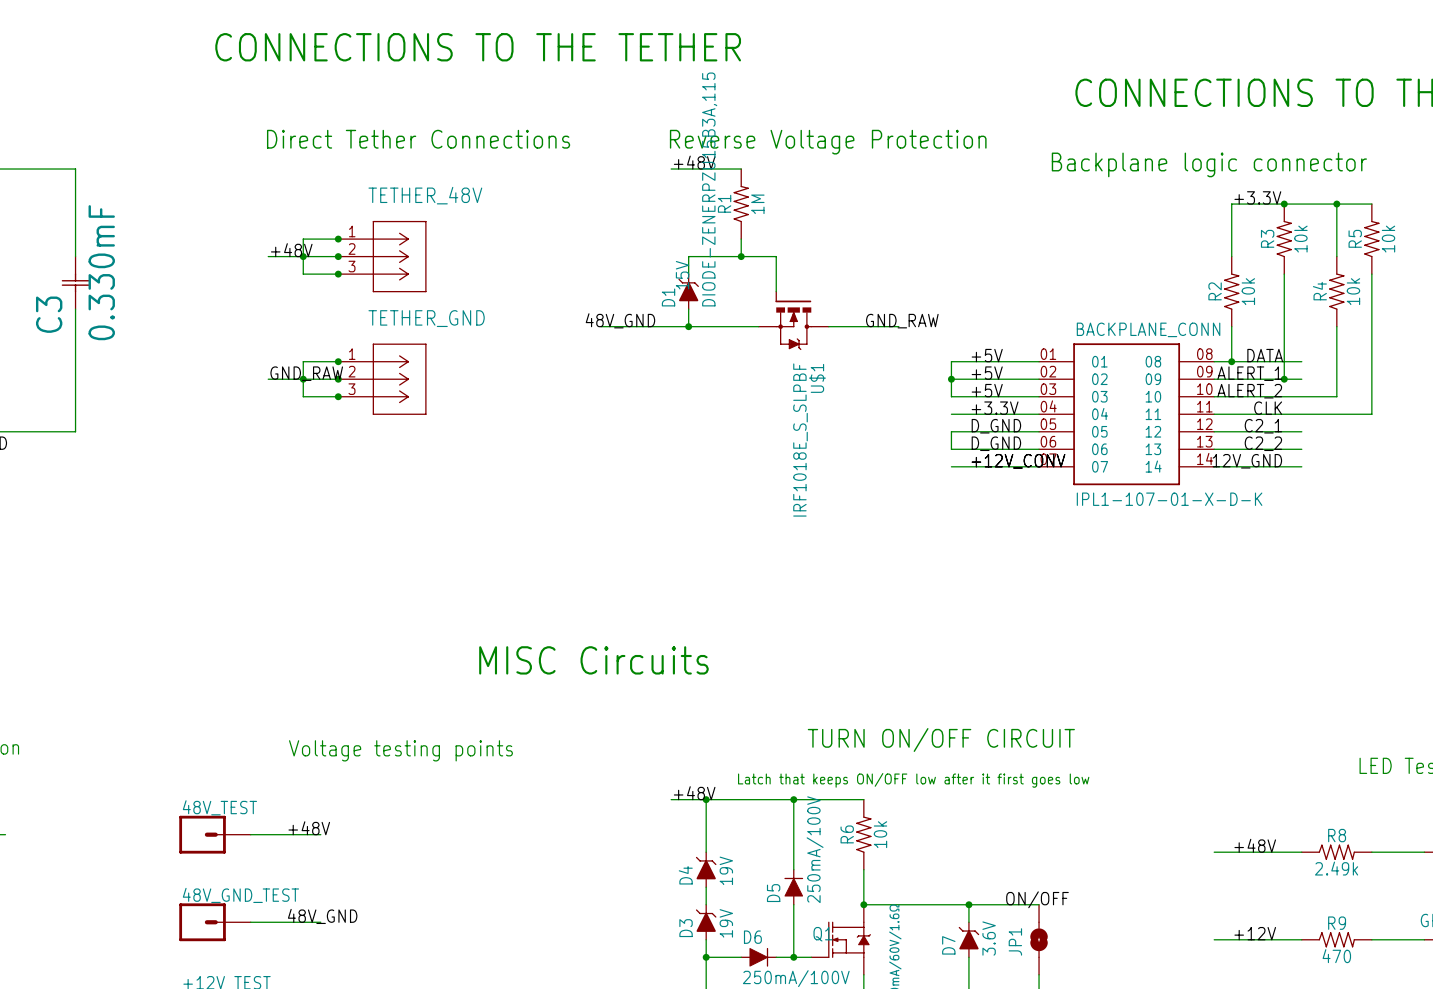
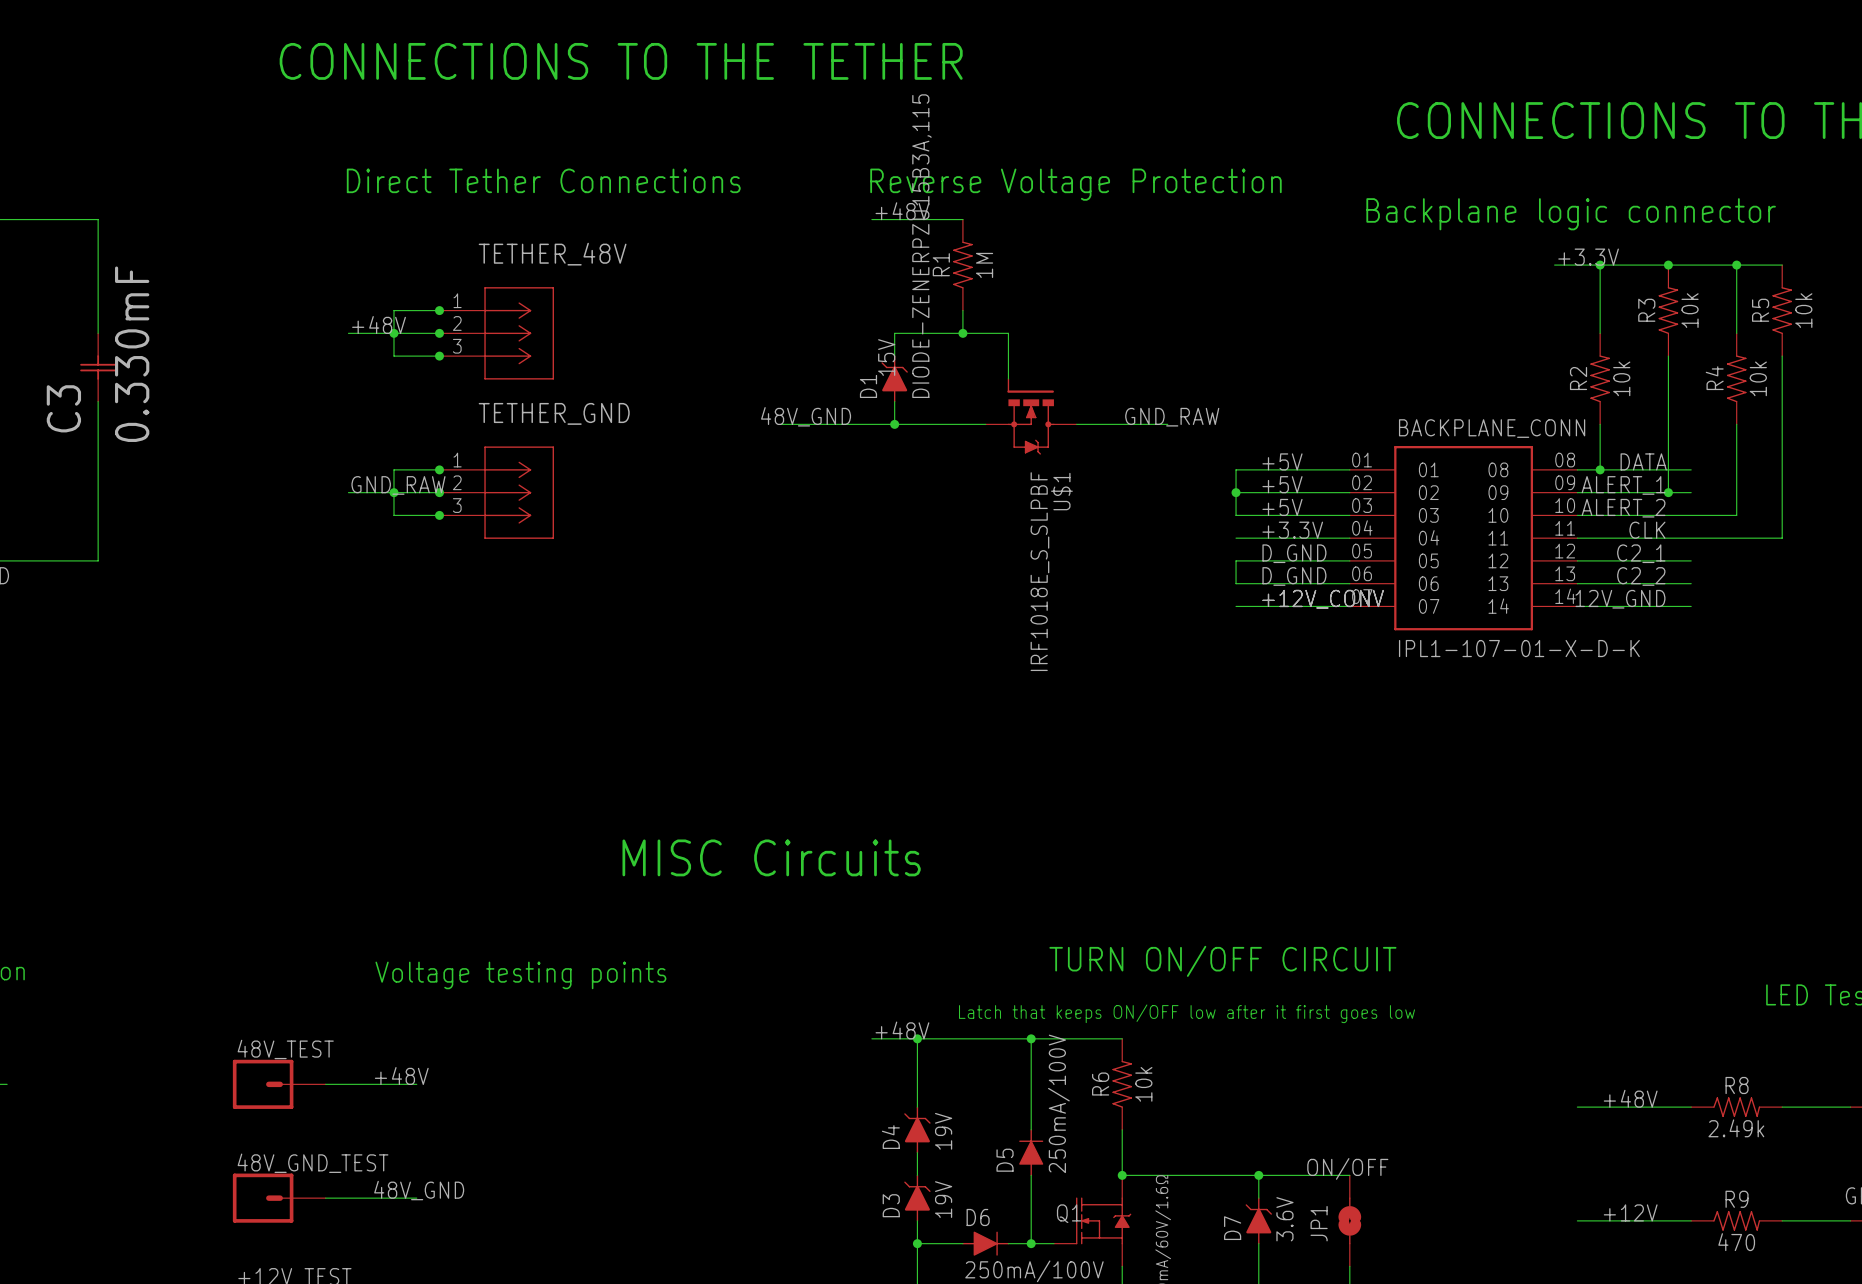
label position: +3.3V (1257, 197) -> +3.3V (1588, 257)
wire: none -> (1554, 265) (1600, 265)
junction: none -> (1600, 265)

